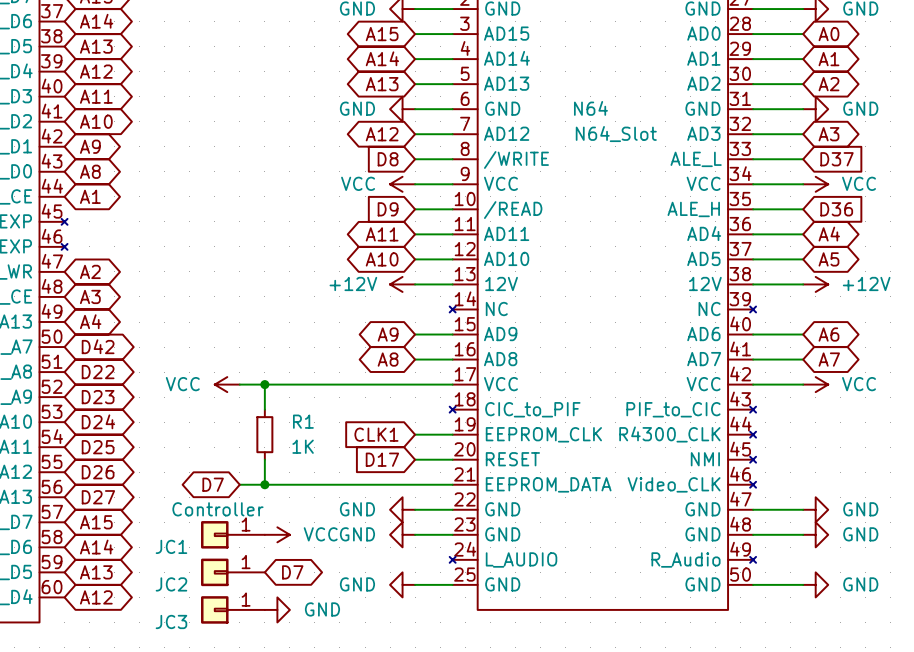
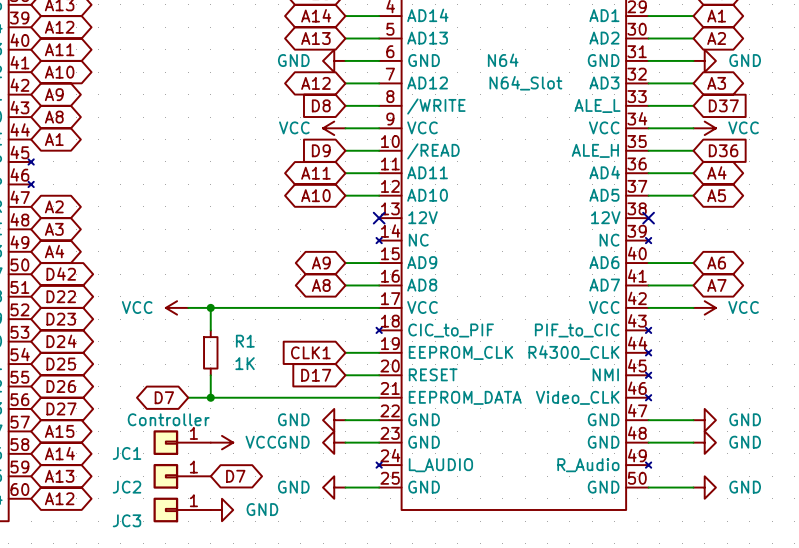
power symbol: +12V (402, 284) -> none
wire: (415, 284) (452, 284) -> none
no-connect mark: none -> (379, 218)
wire: (753, 284) (803, 284) -> none
no-connect mark: none -> (648, 218)
power symbol: +12V (815, 284) -> none

